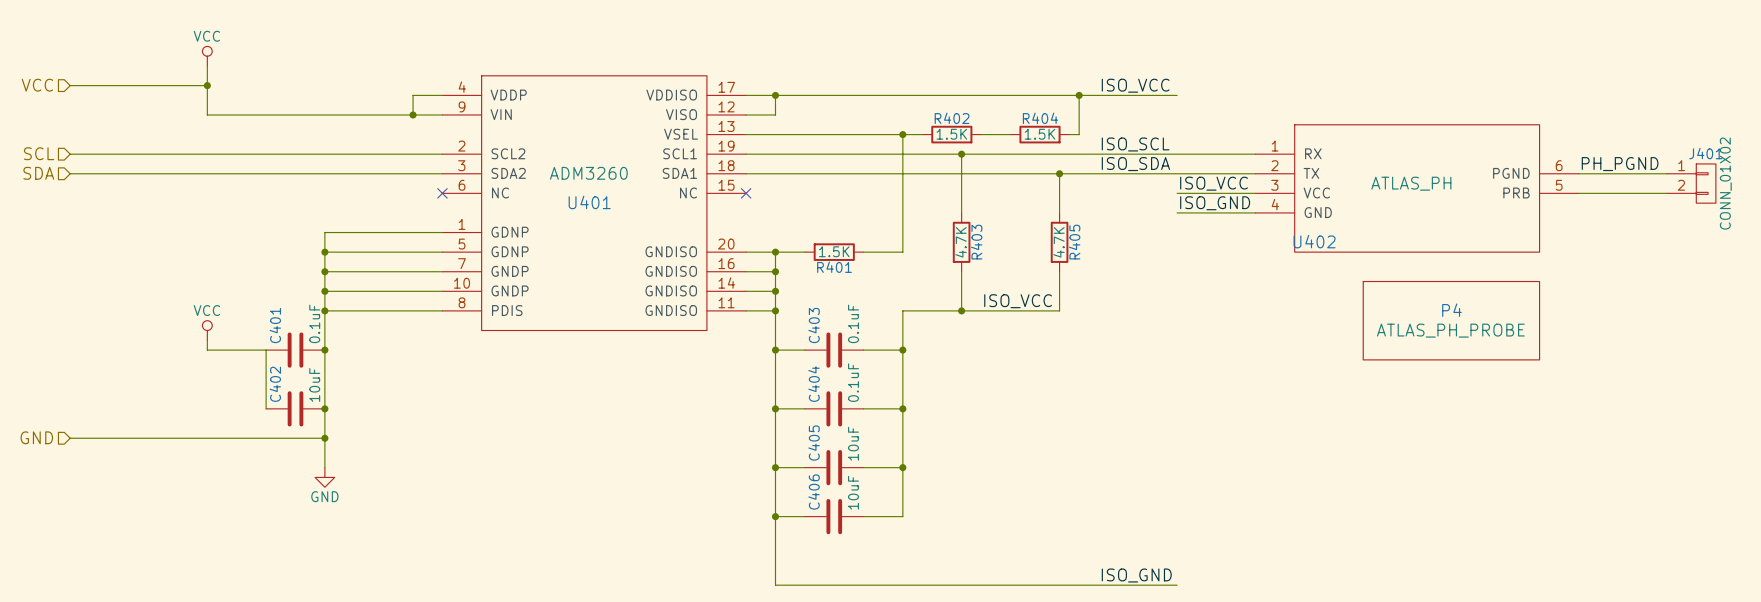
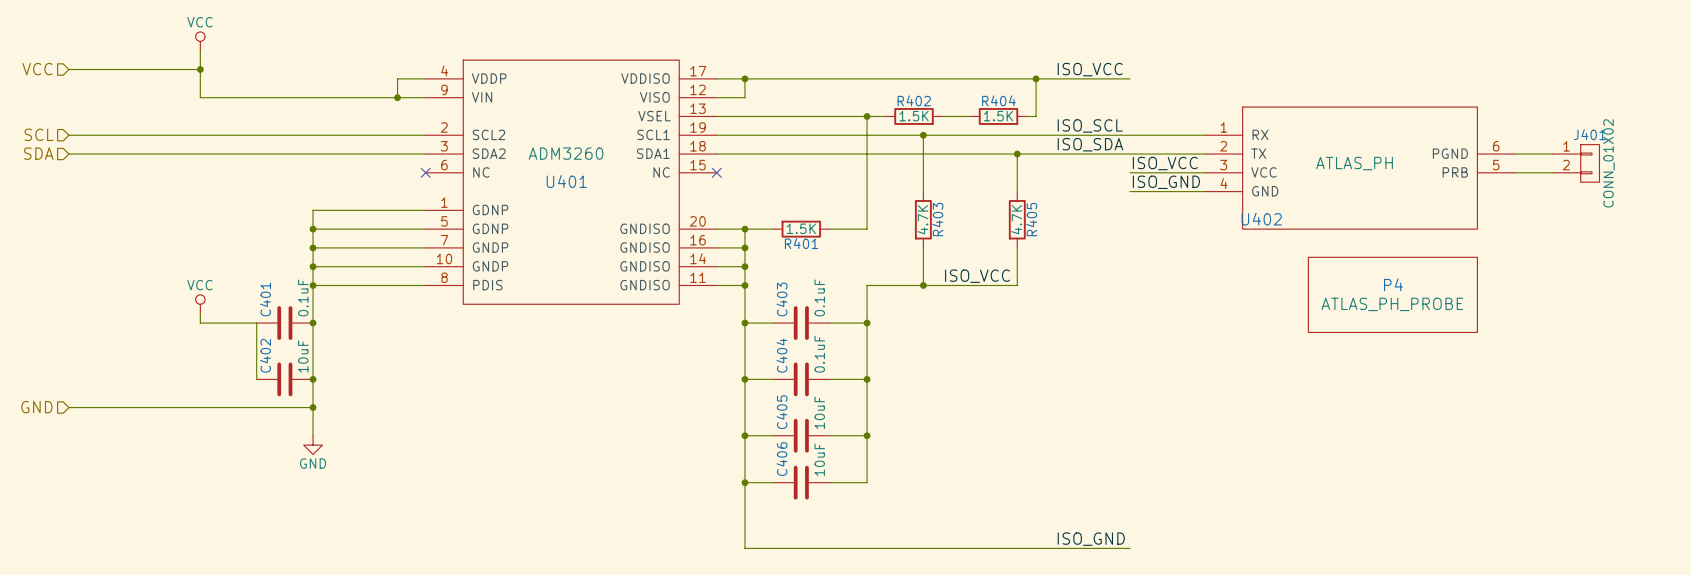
label: PH_PGND (1620, 164) -> none
J401 position: (1691, 183) -> (1576, 163)

